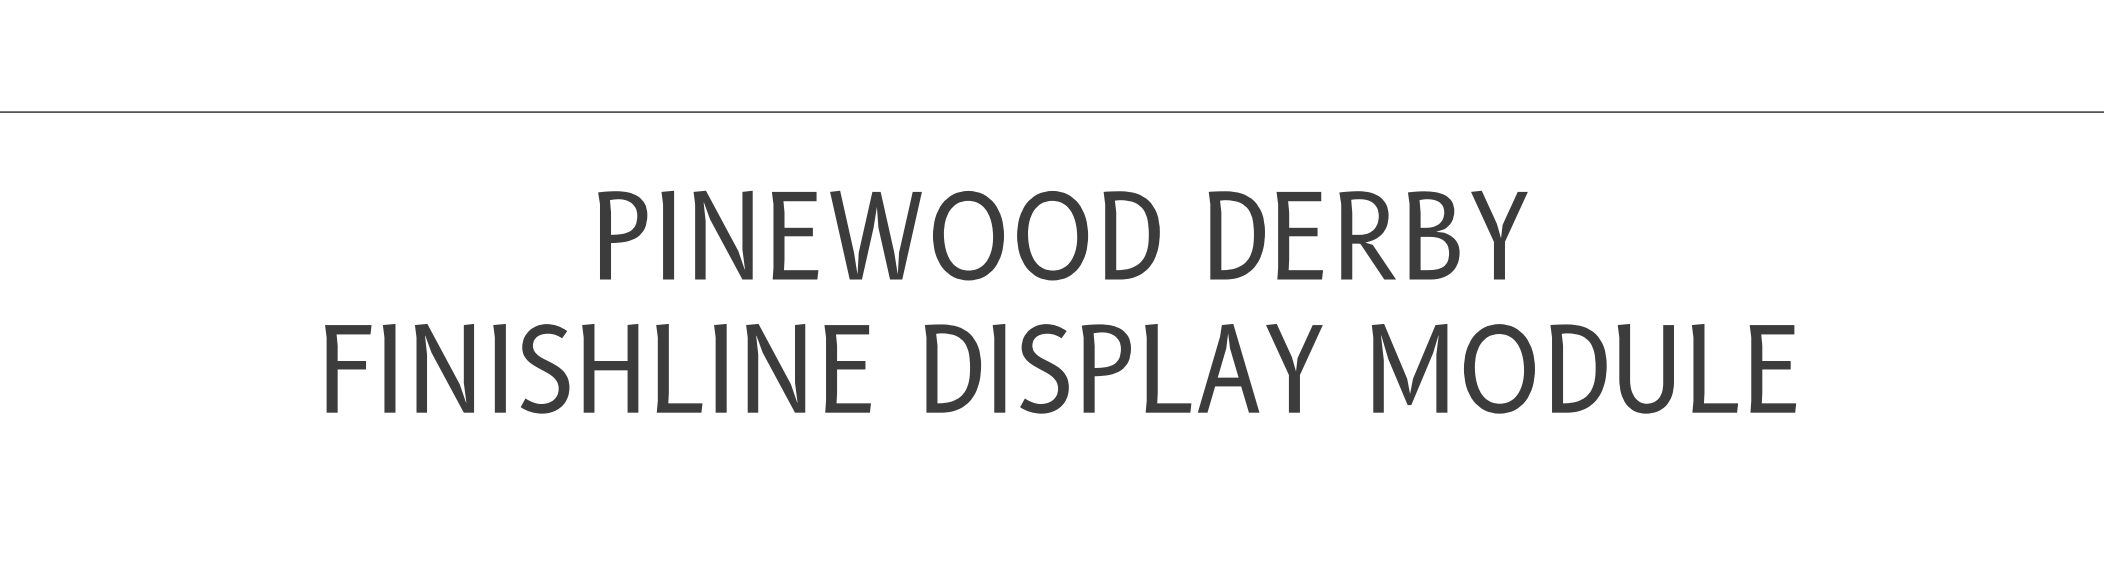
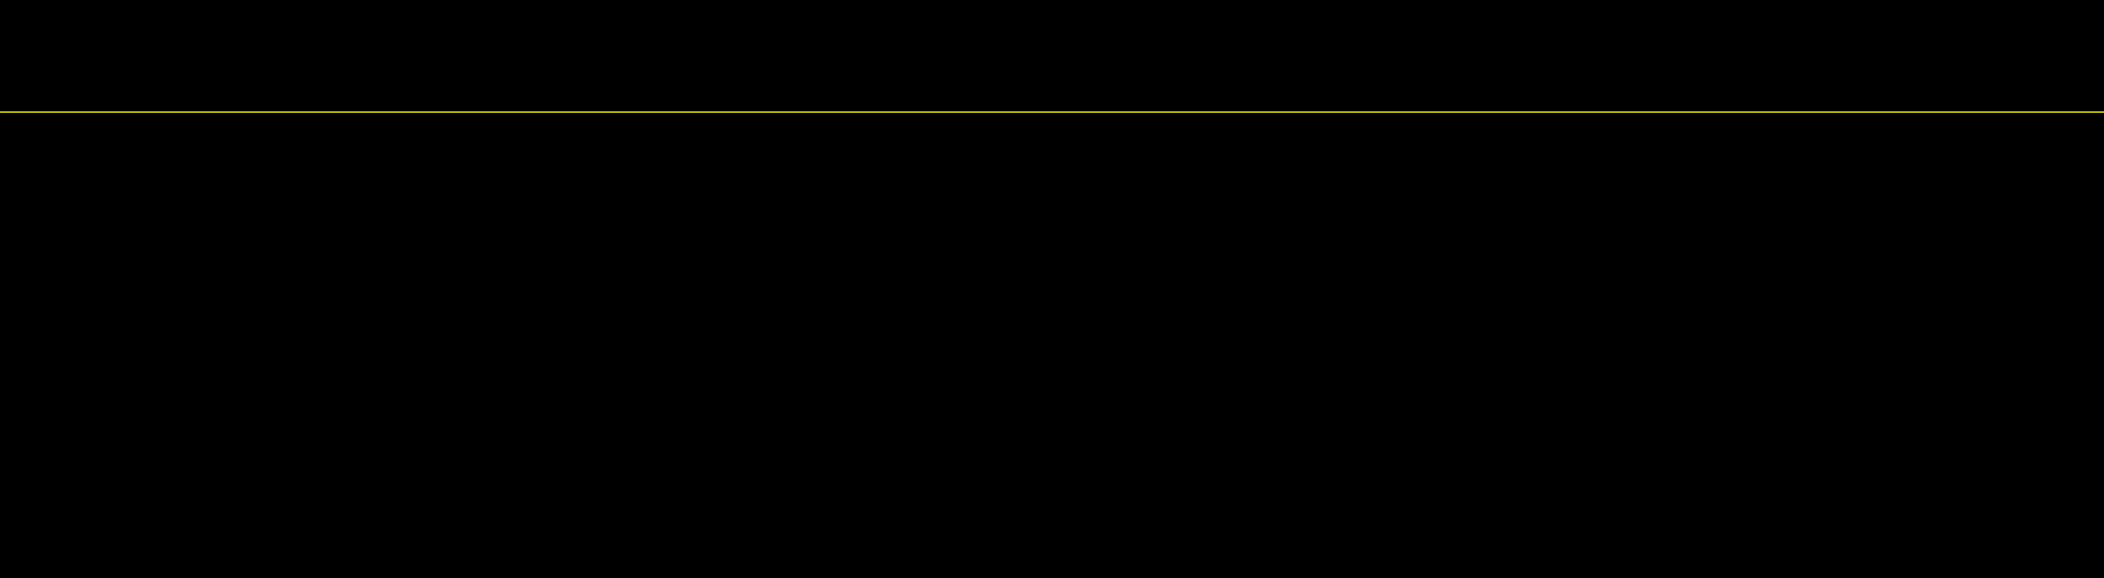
text: PINEWOOD DERBY (1062, 235) -> none
text: FINISHLINE DISPLAY MODULE (1060, 368) -> none

